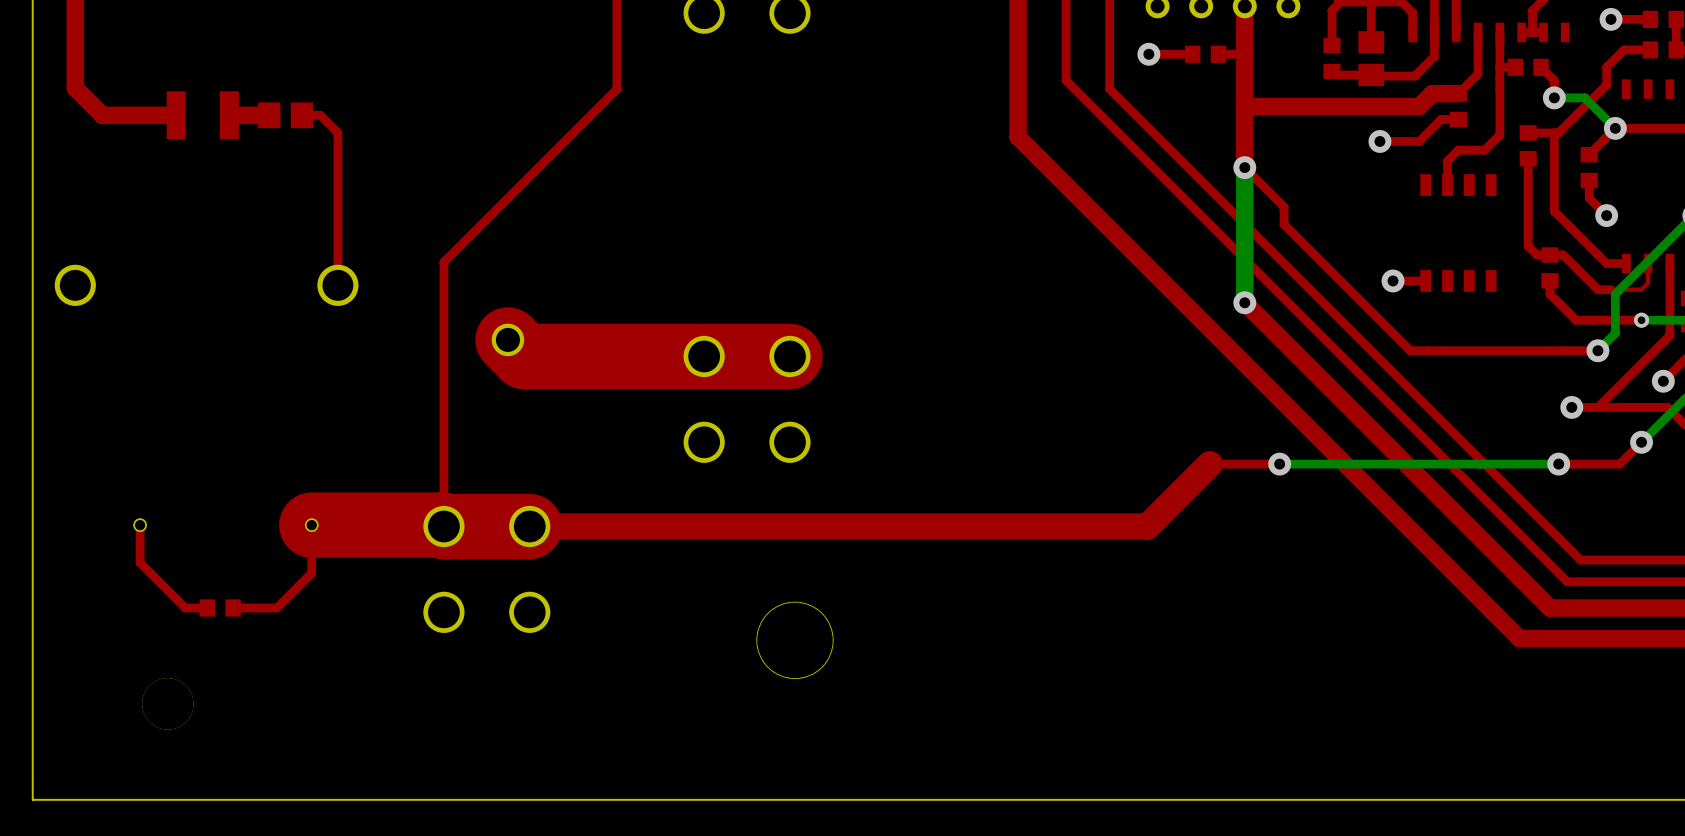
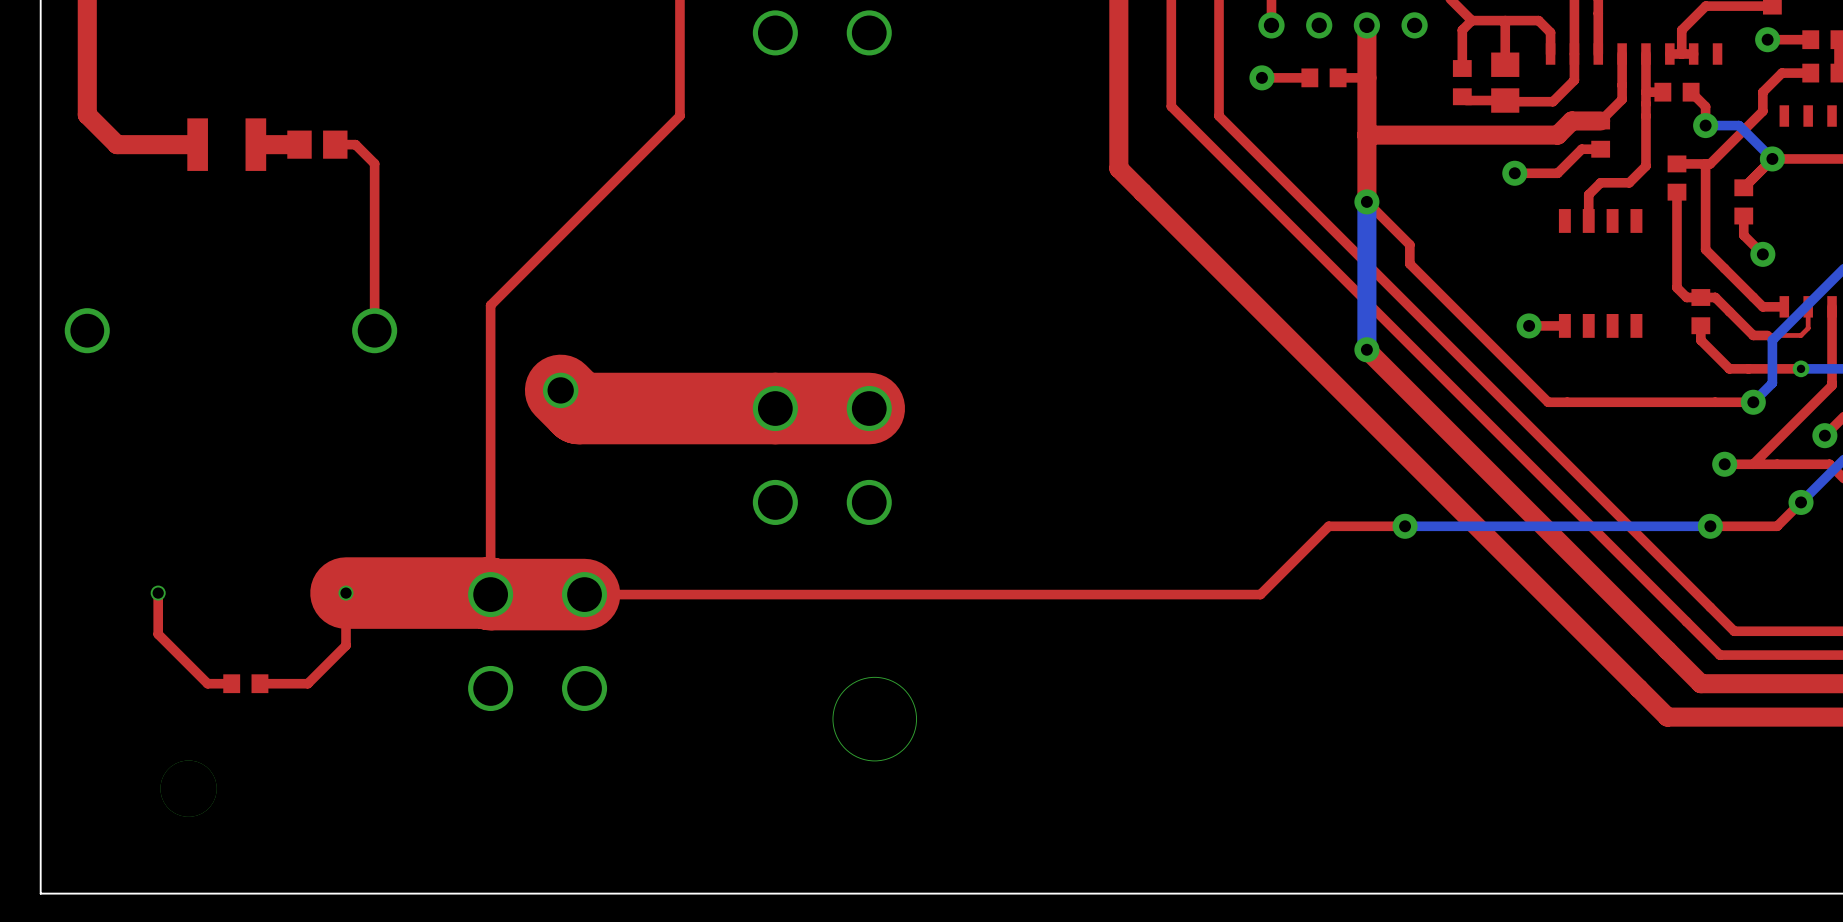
top track width: thick (1209, 464) (1147, 526) (529, 526) -> thin (1328, 526) (1260, 594) (584, 594)

